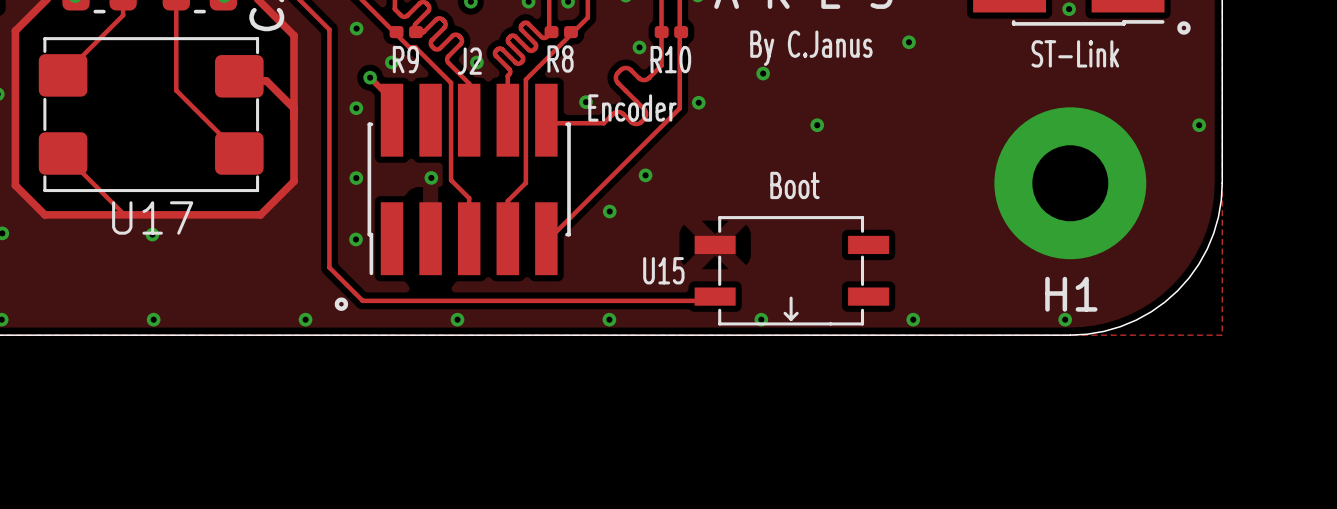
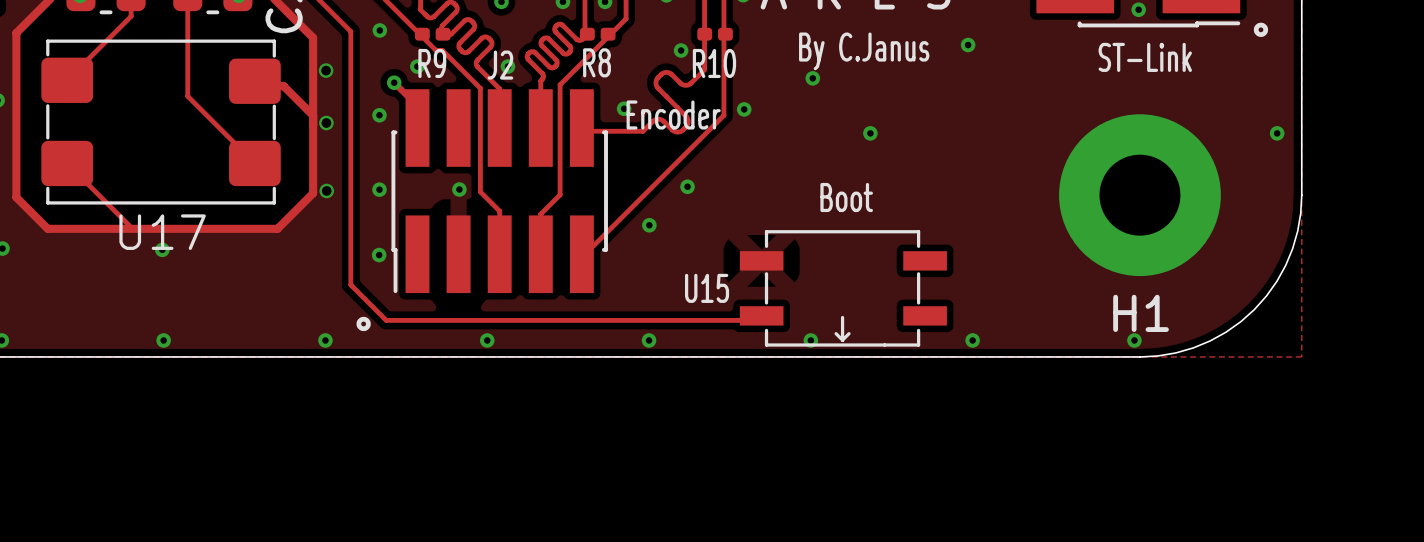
via: none -> (326, 70)
via: none -> (326, 123)
via: none -> (326, 190)

